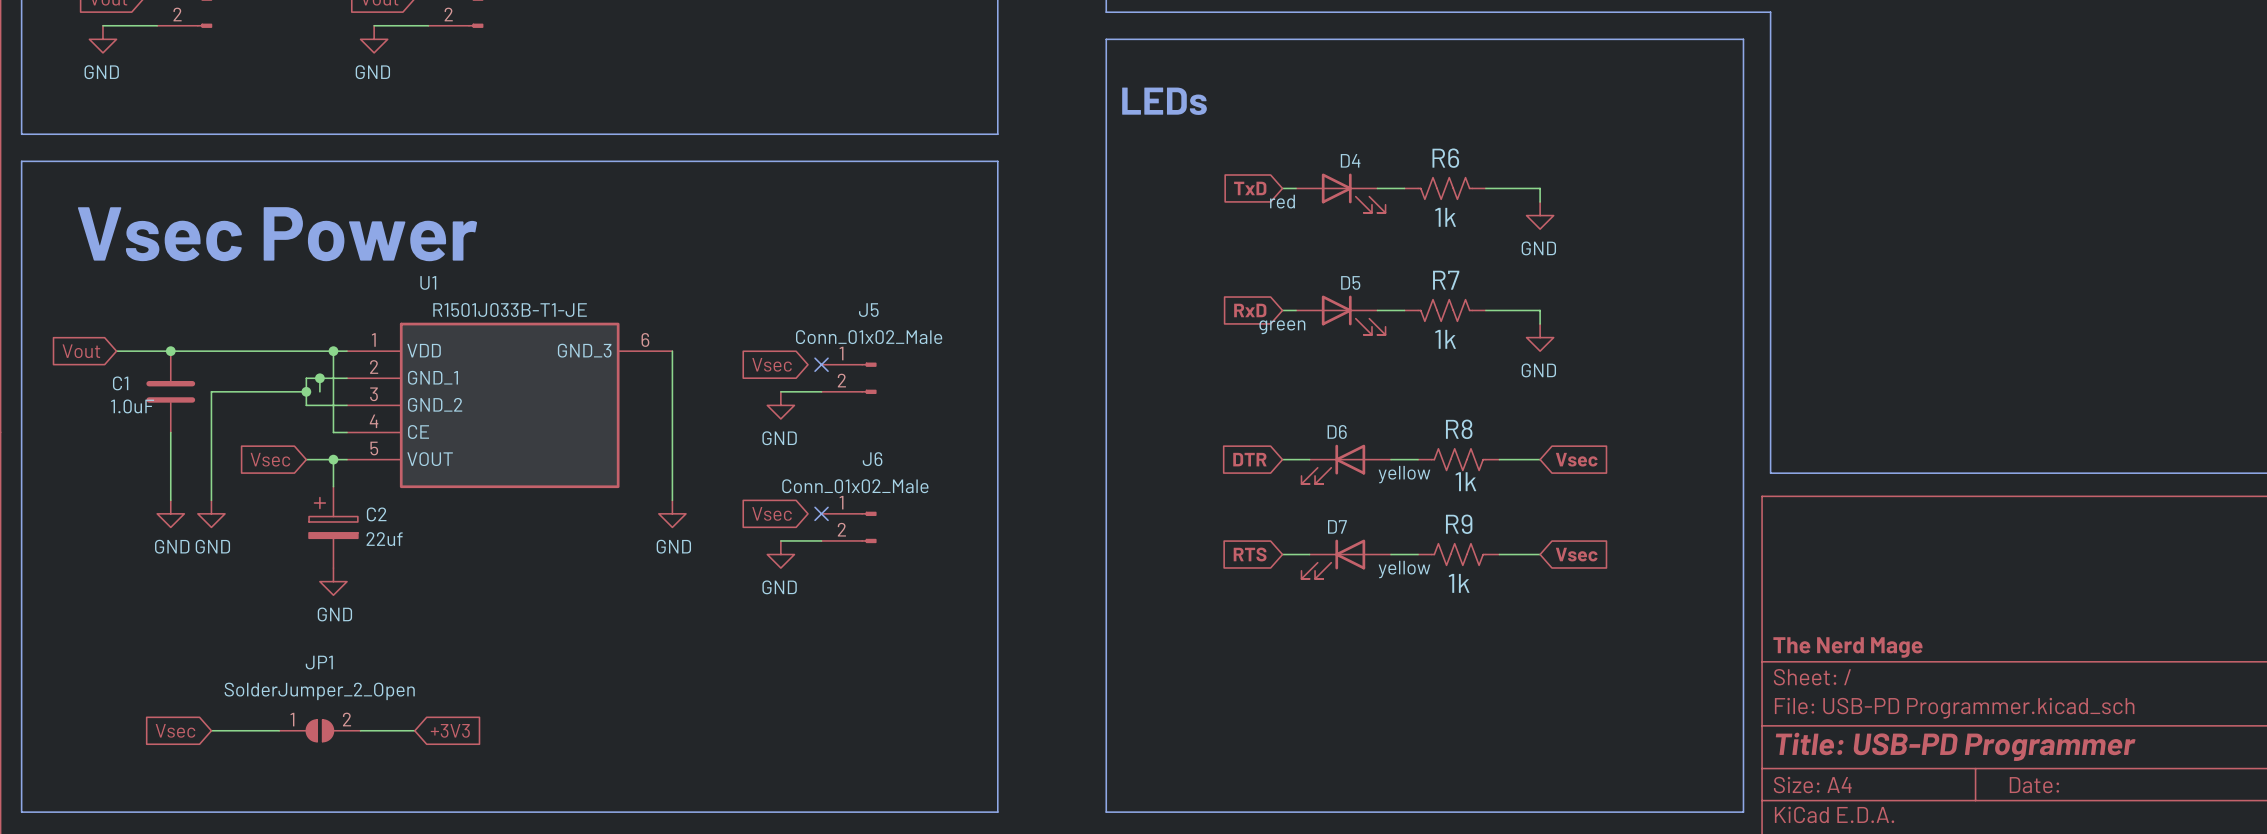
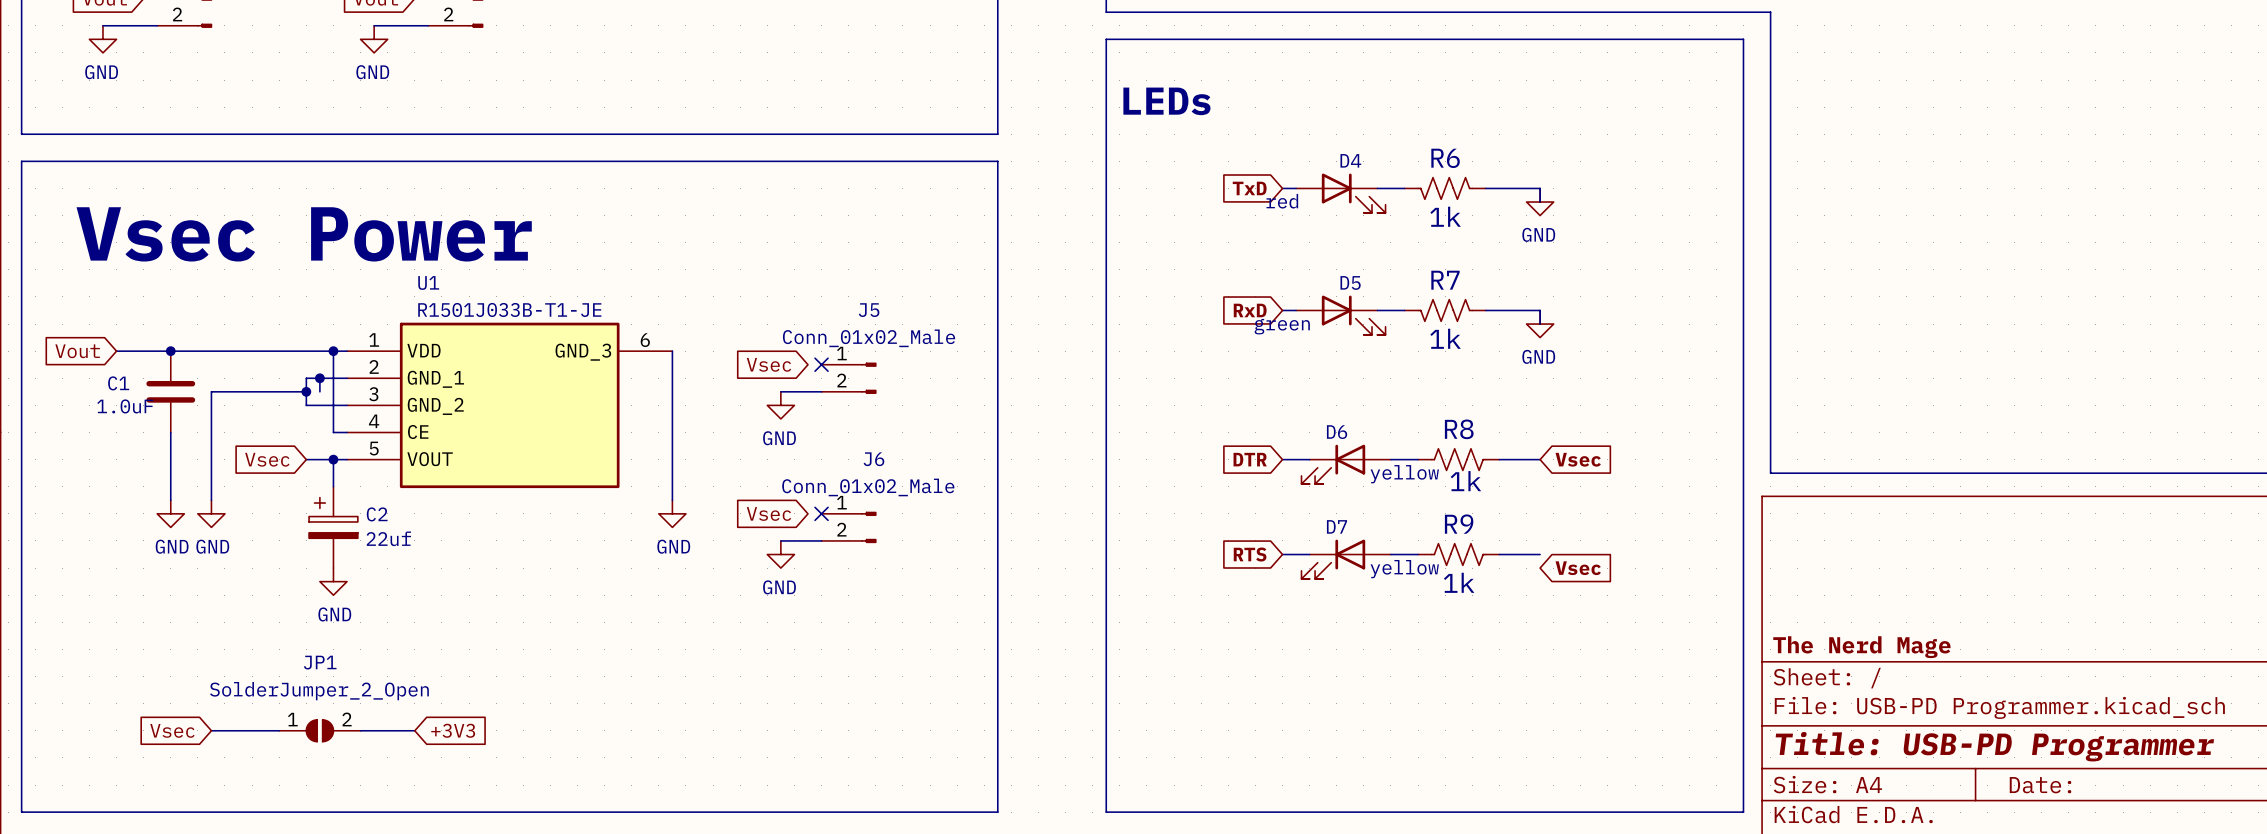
power symbol position: GND (1540, 215) -> GND (1540, 202)
power symbol position: GND (1540, 337) -> GND (1540, 324)
global label position: Vsec (1576, 554) -> Vsec (1578, 568)

